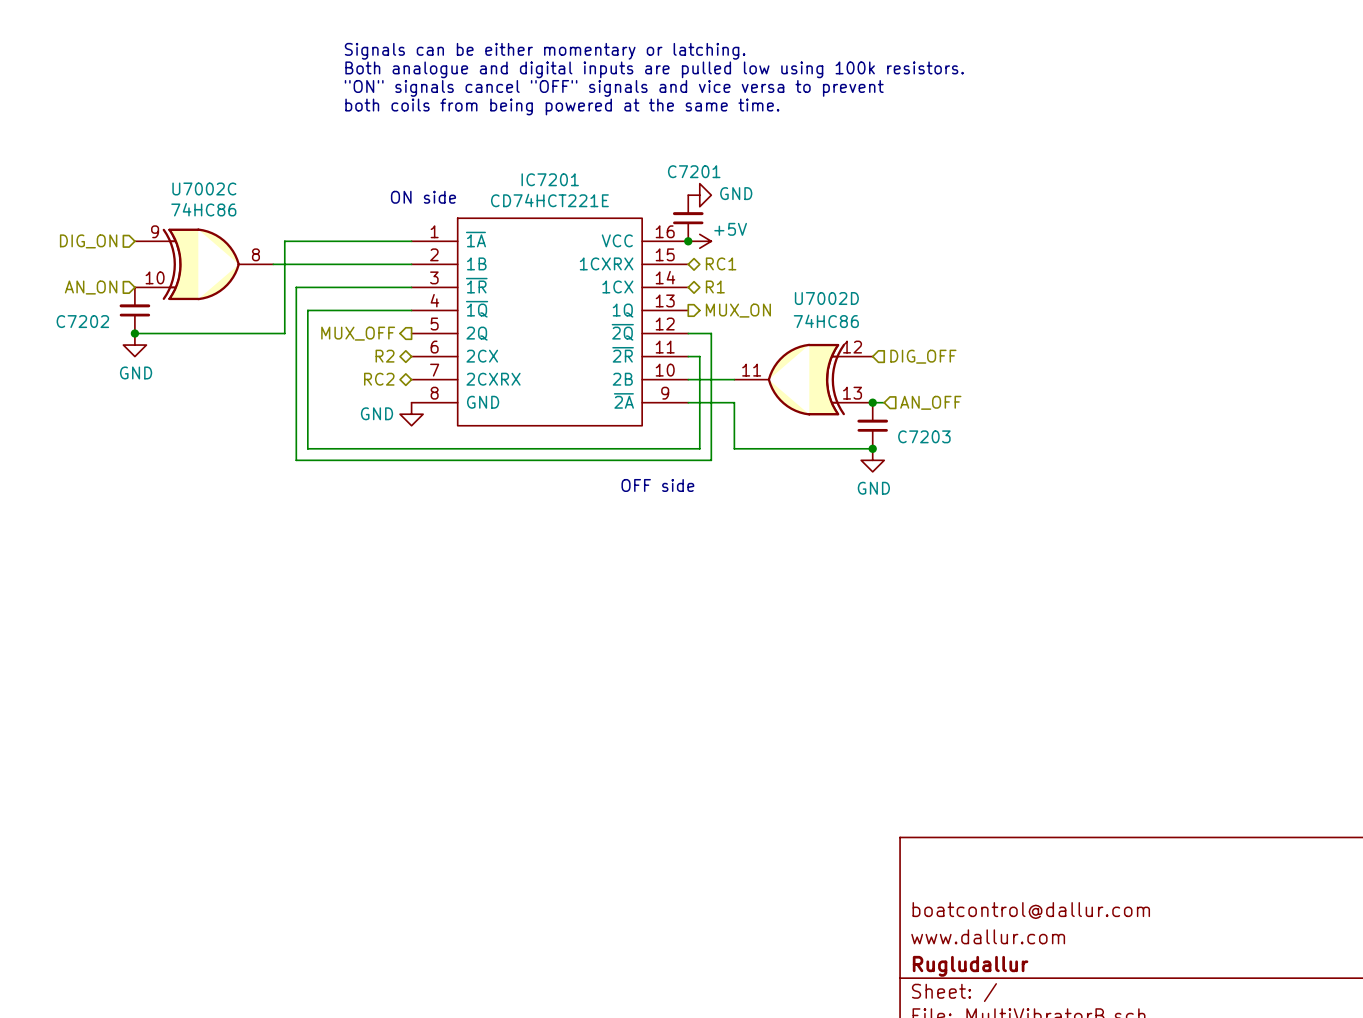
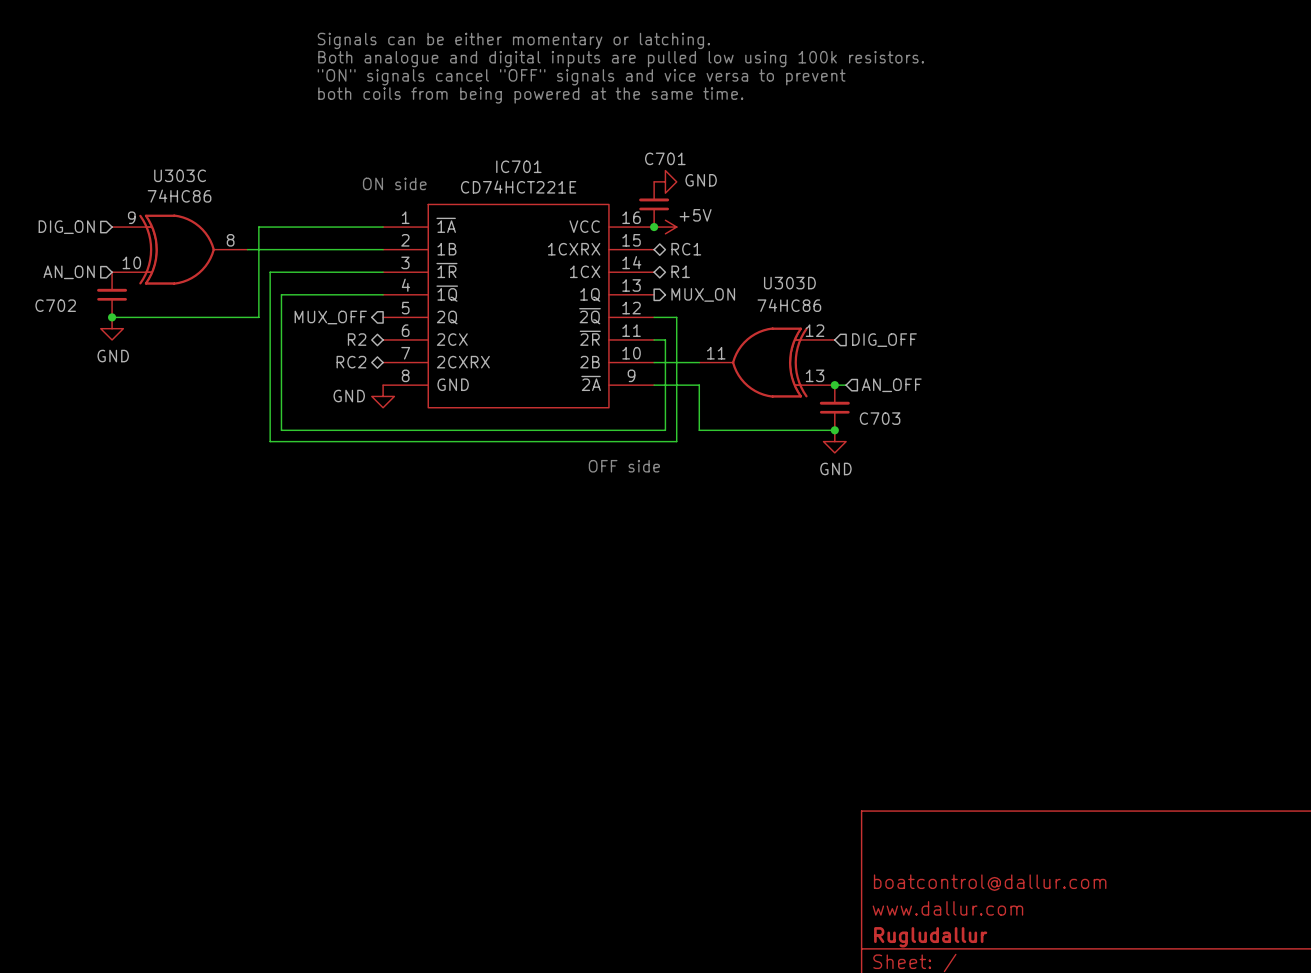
C7201 name: C7201 (694, 171) -> C701 (665, 158)
IC7201 name: IC7201 (550, 179) -> IC701 (518, 166)
U7002C name: U7002C (204, 188) -> U303C (180, 175)
U7002D name: U7002D (826, 298) -> U303D (789, 283)
C7202 name: C7202 (82, 321) -> C702 (55, 305)
C7203 name: C7203 (924, 436) -> C703 (880, 418)

